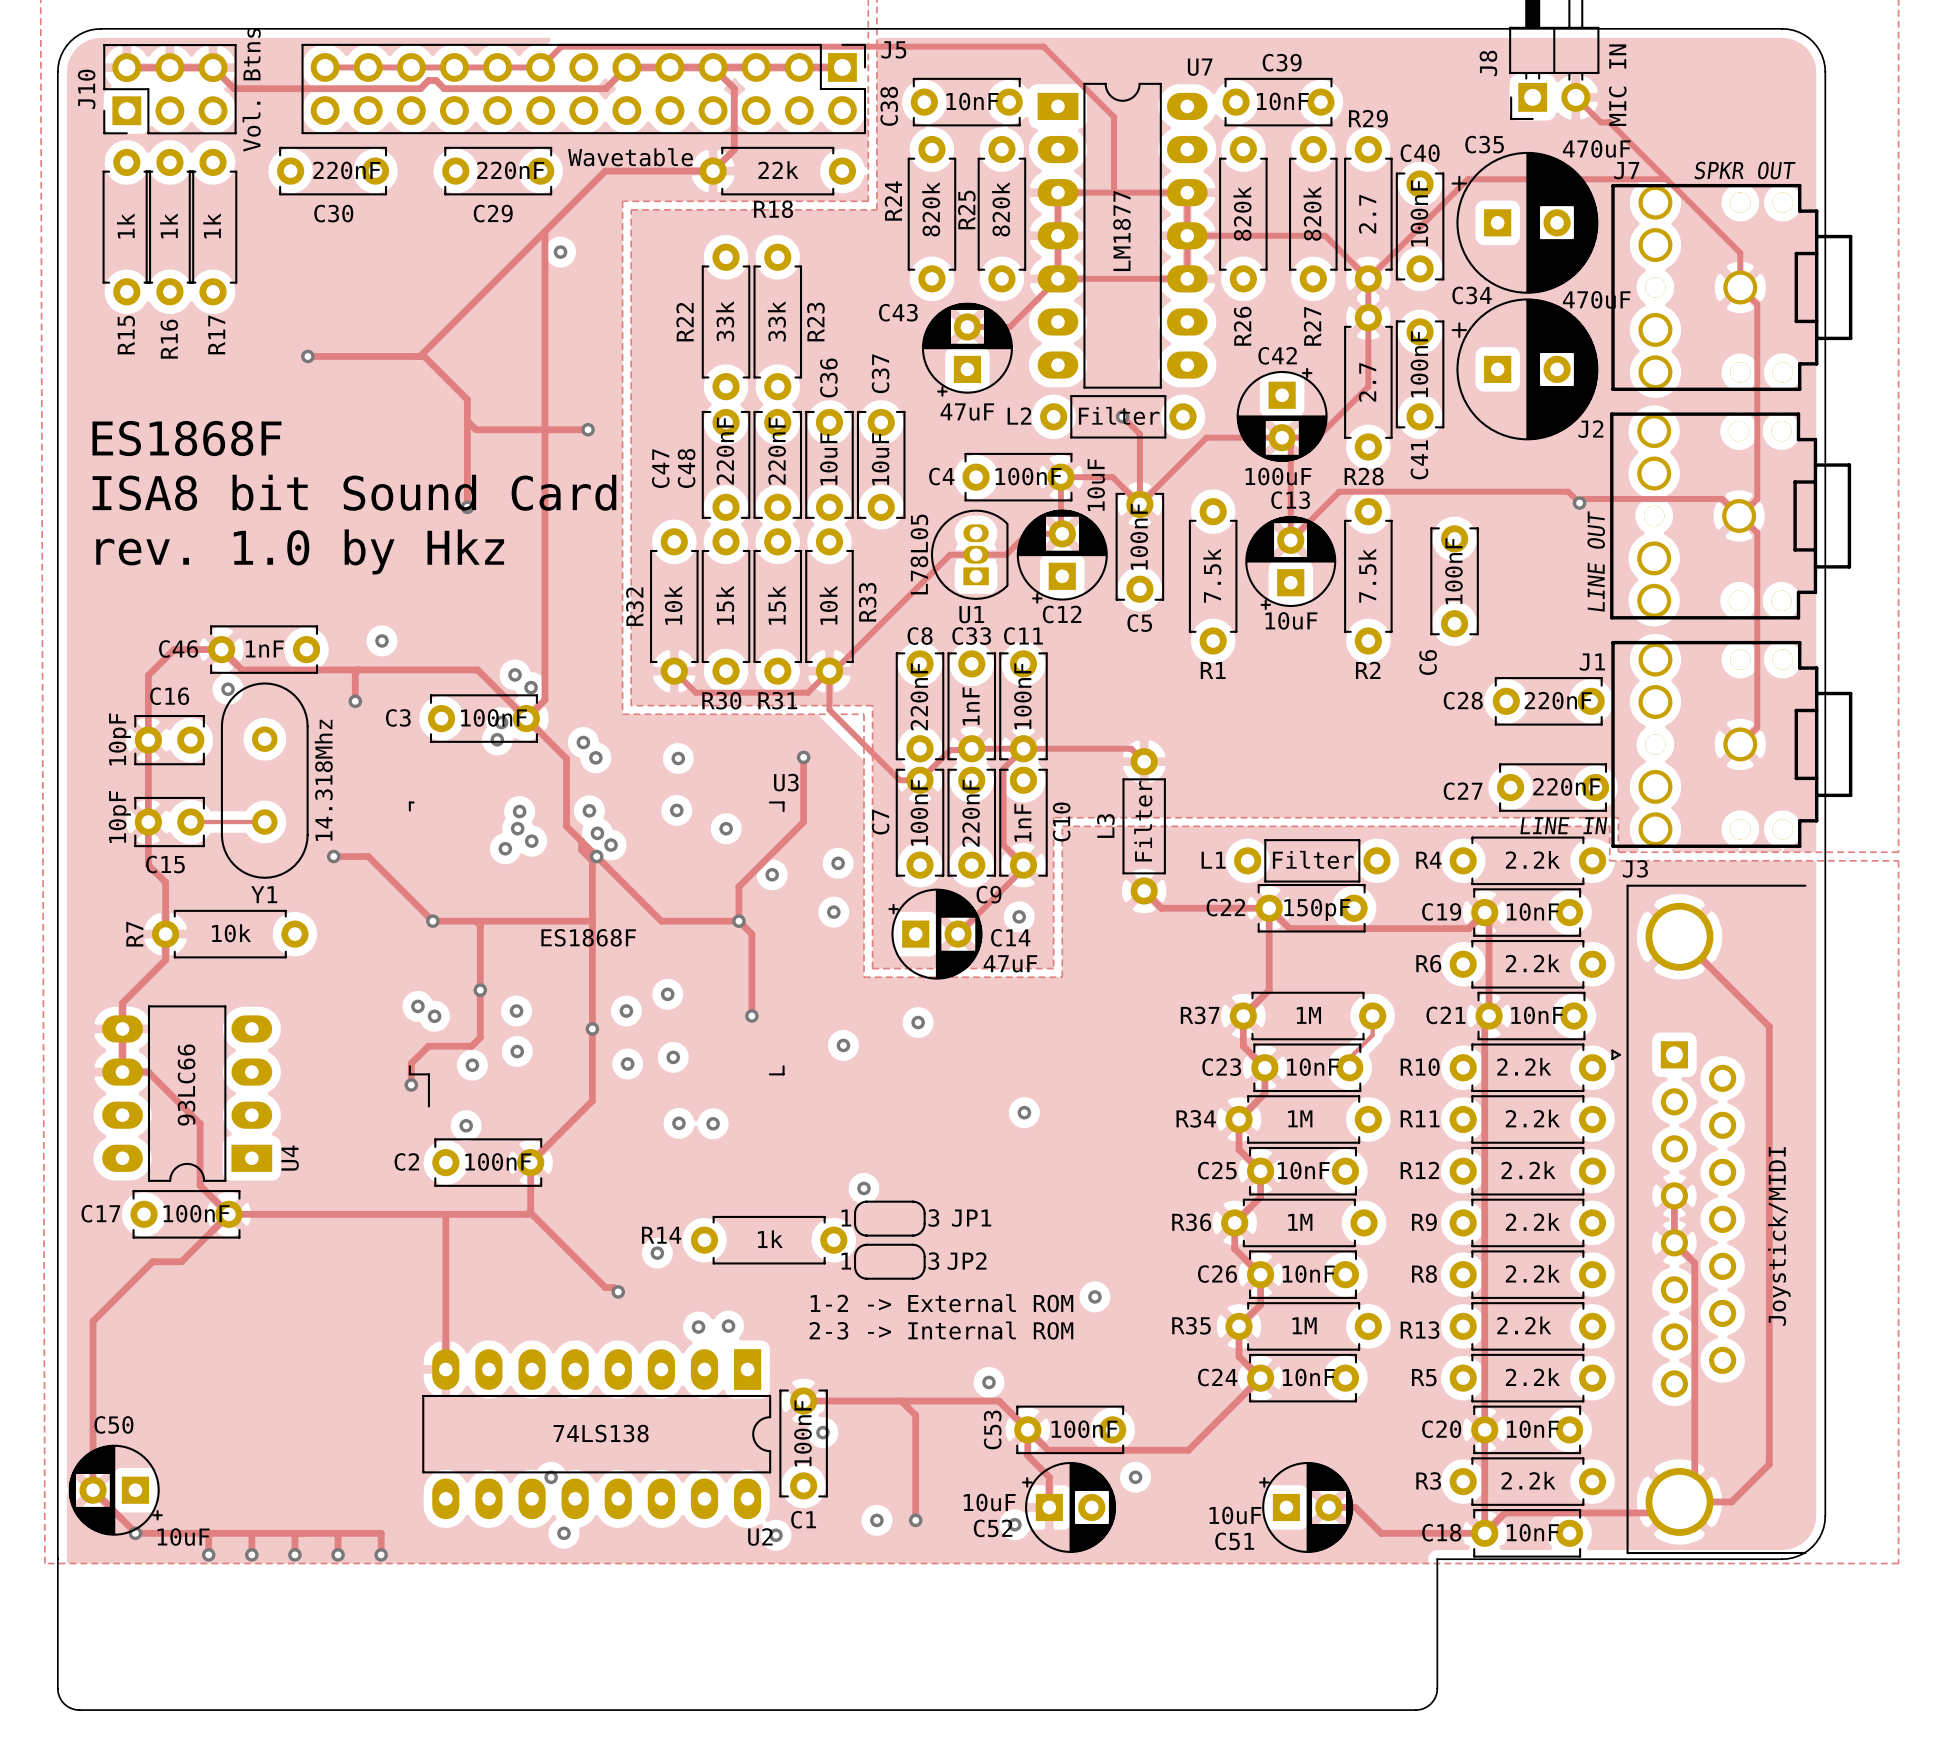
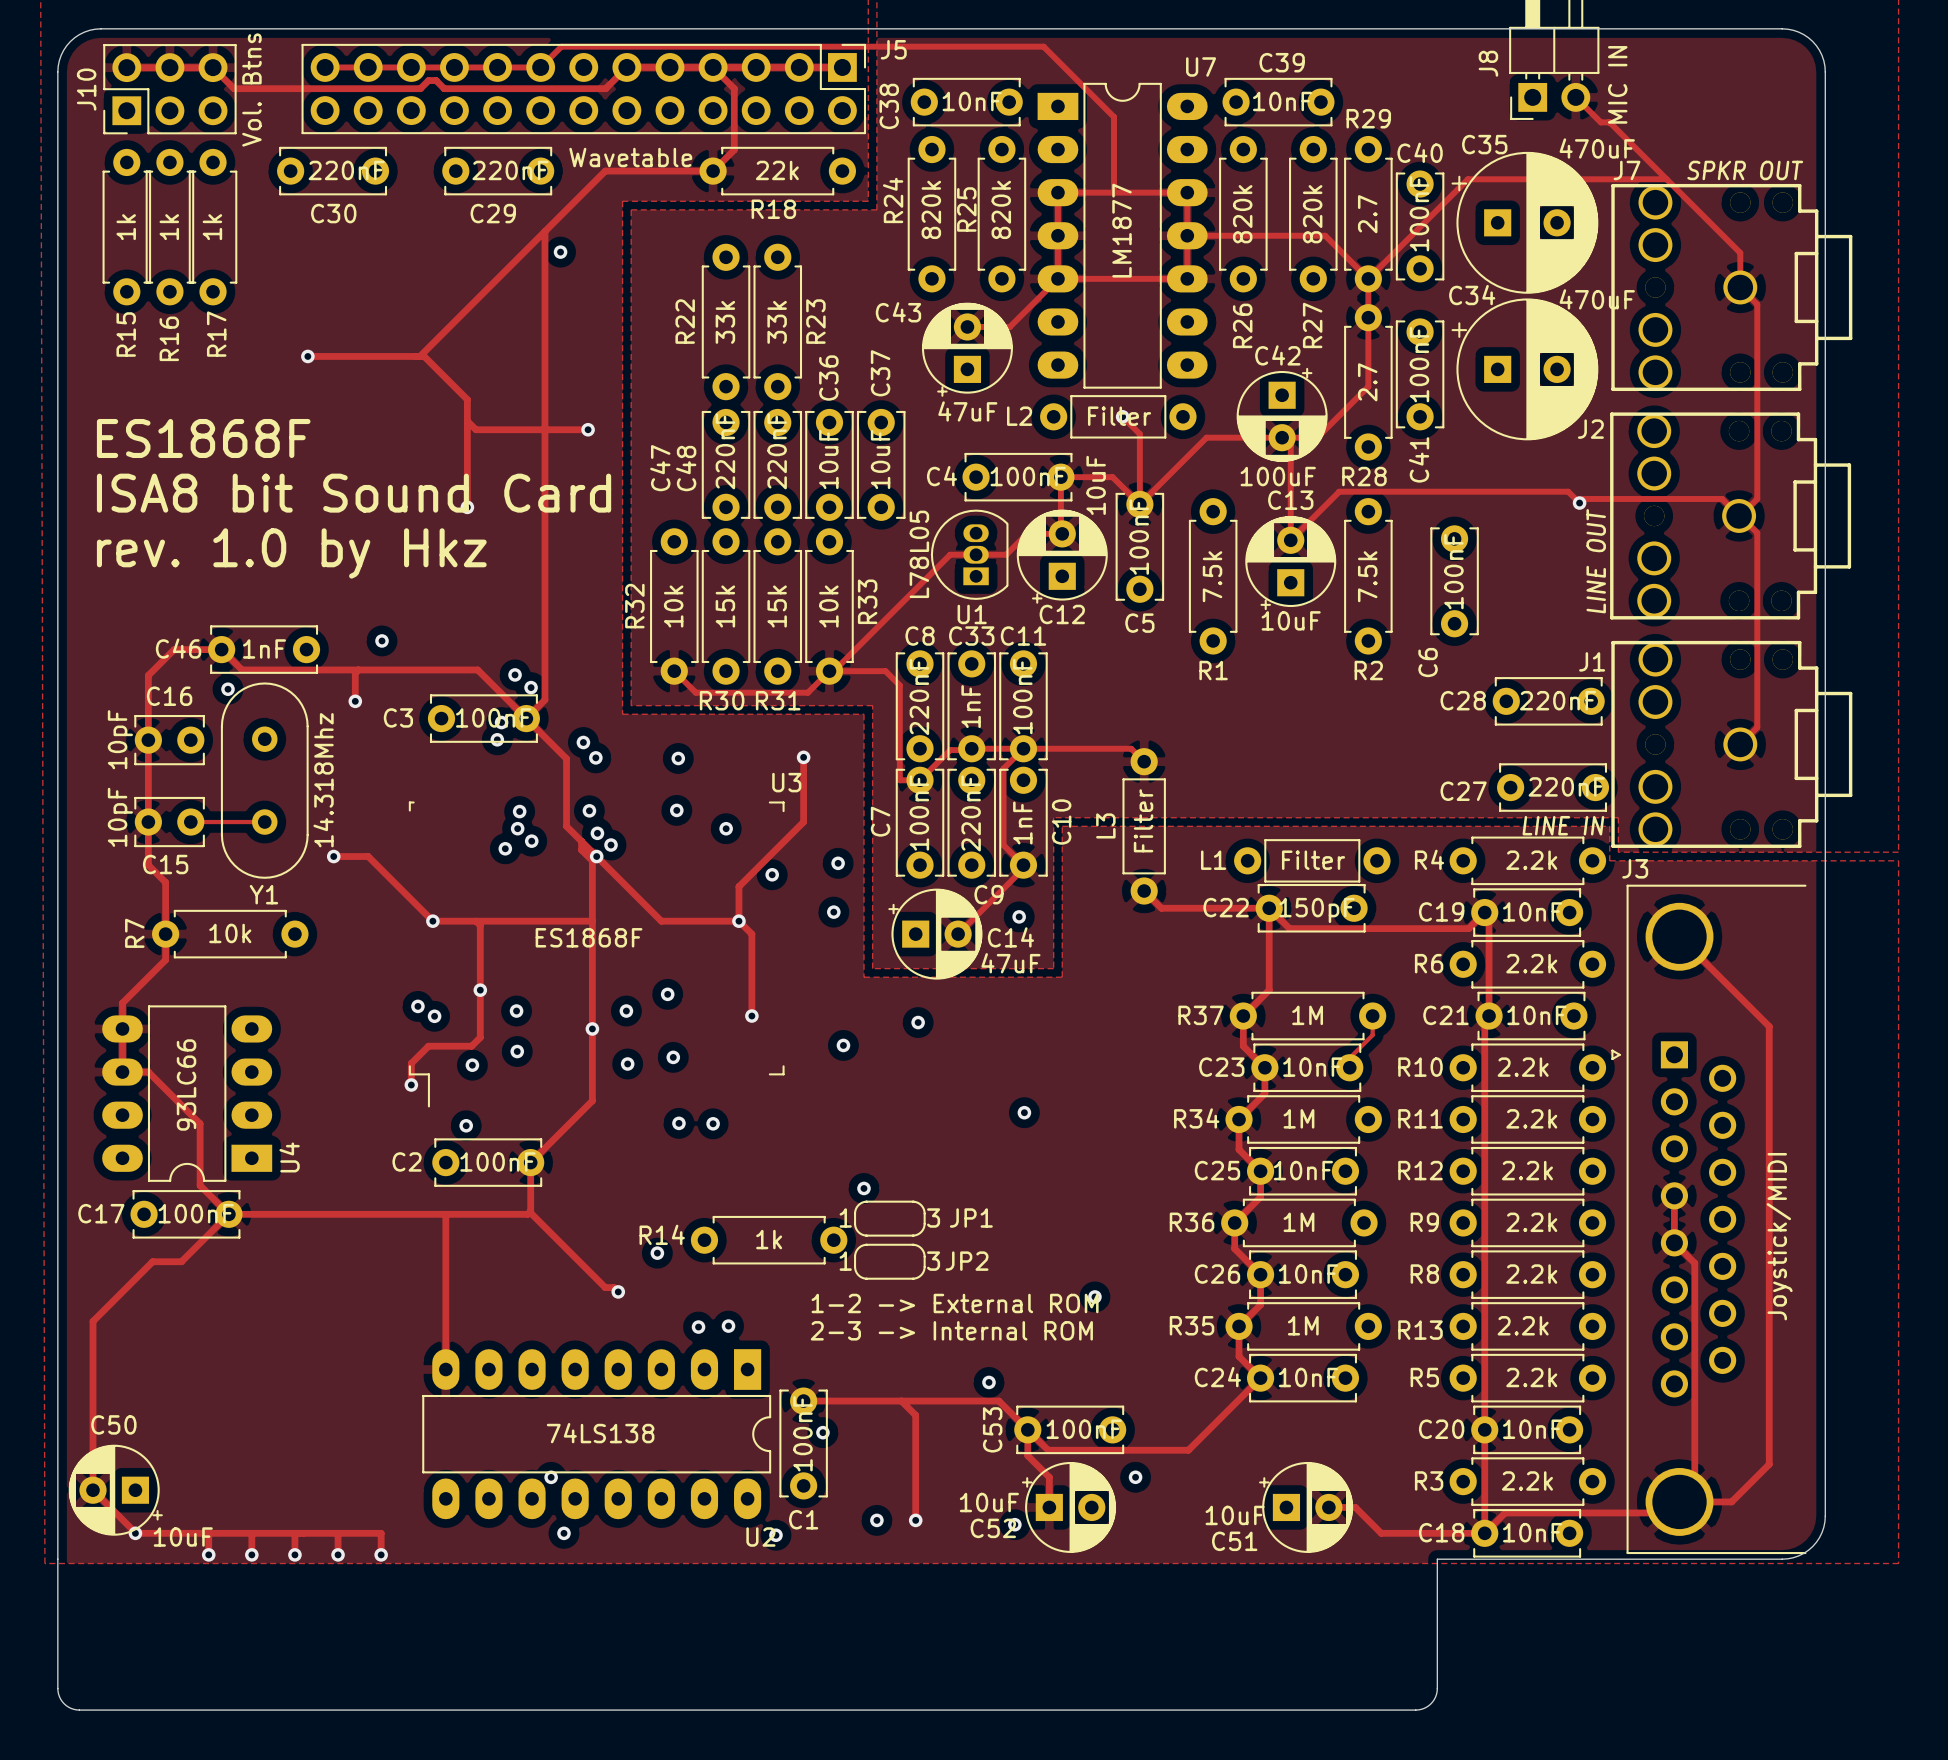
track: (829, 671) (829, 709) (899, 780) -> (833, 671) (885, 671) (899, 685) (899, 780)

